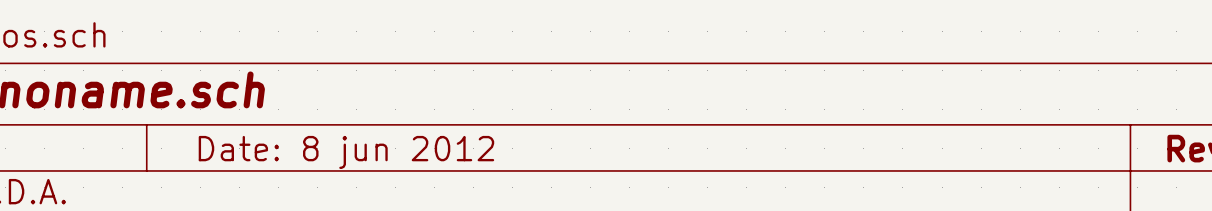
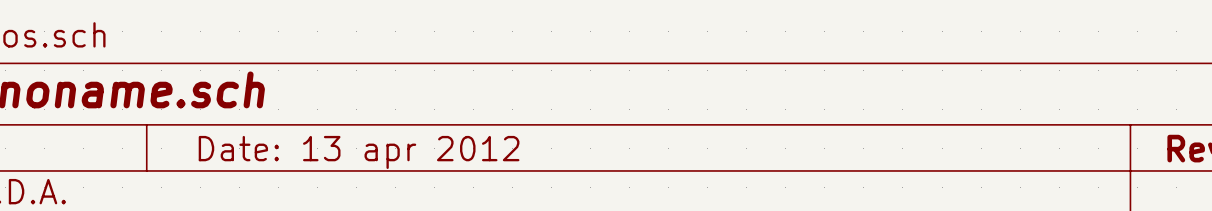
title block: Date: 8 jun 2012 (346, 152) -> Date: 13 apr 2012 (359, 152)

